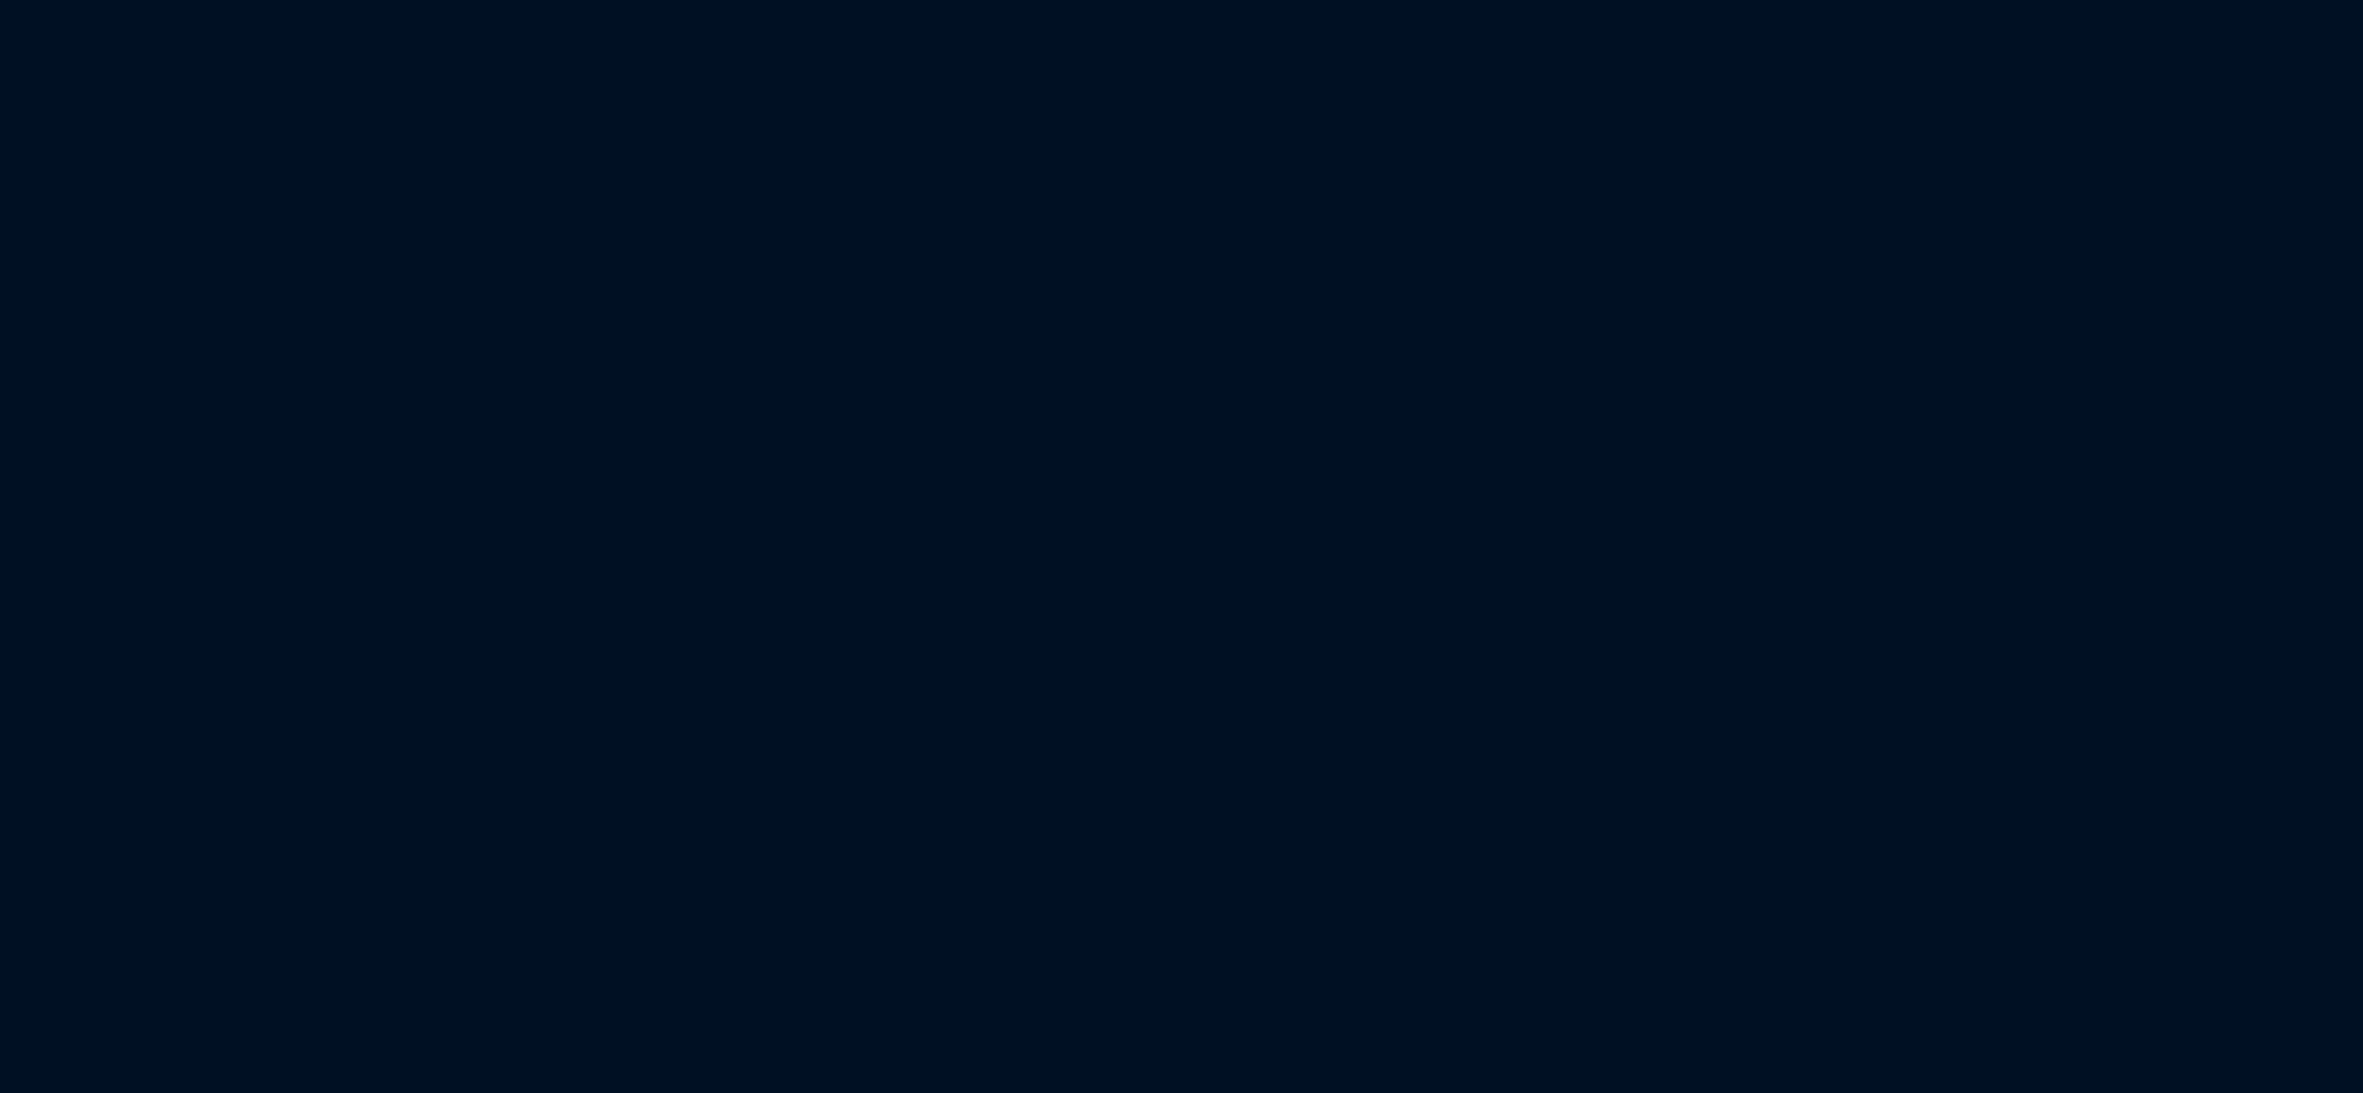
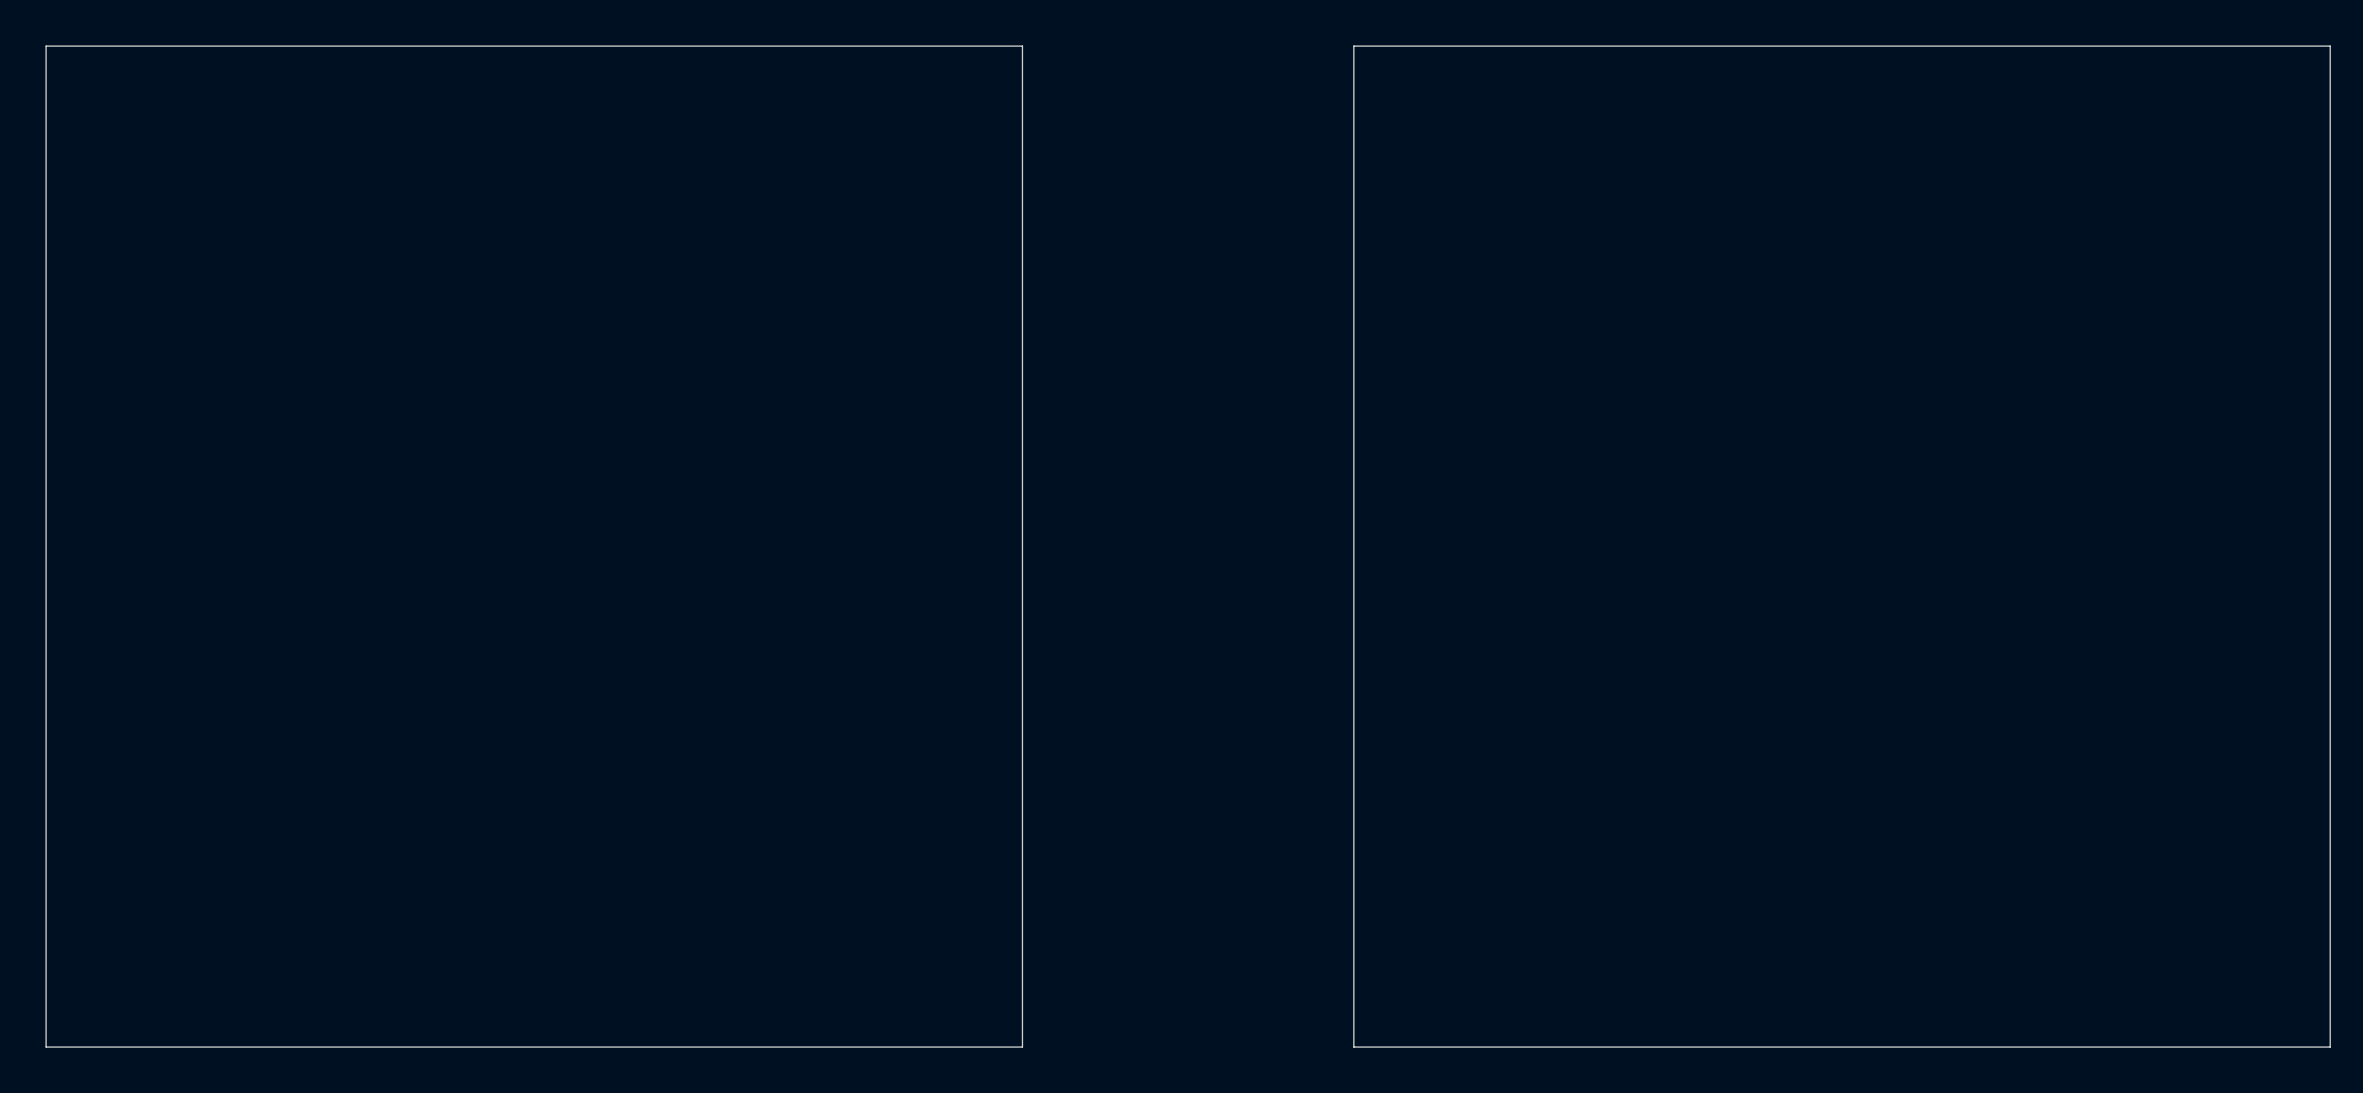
board edge: none -> (46, 46) (1022, 46) (1022, 1047) (46, 1047) (46, 46)
board edge: none -> (1353, 46) (2330, 46) (2330, 1047) (1353, 1047) (1353, 46)

